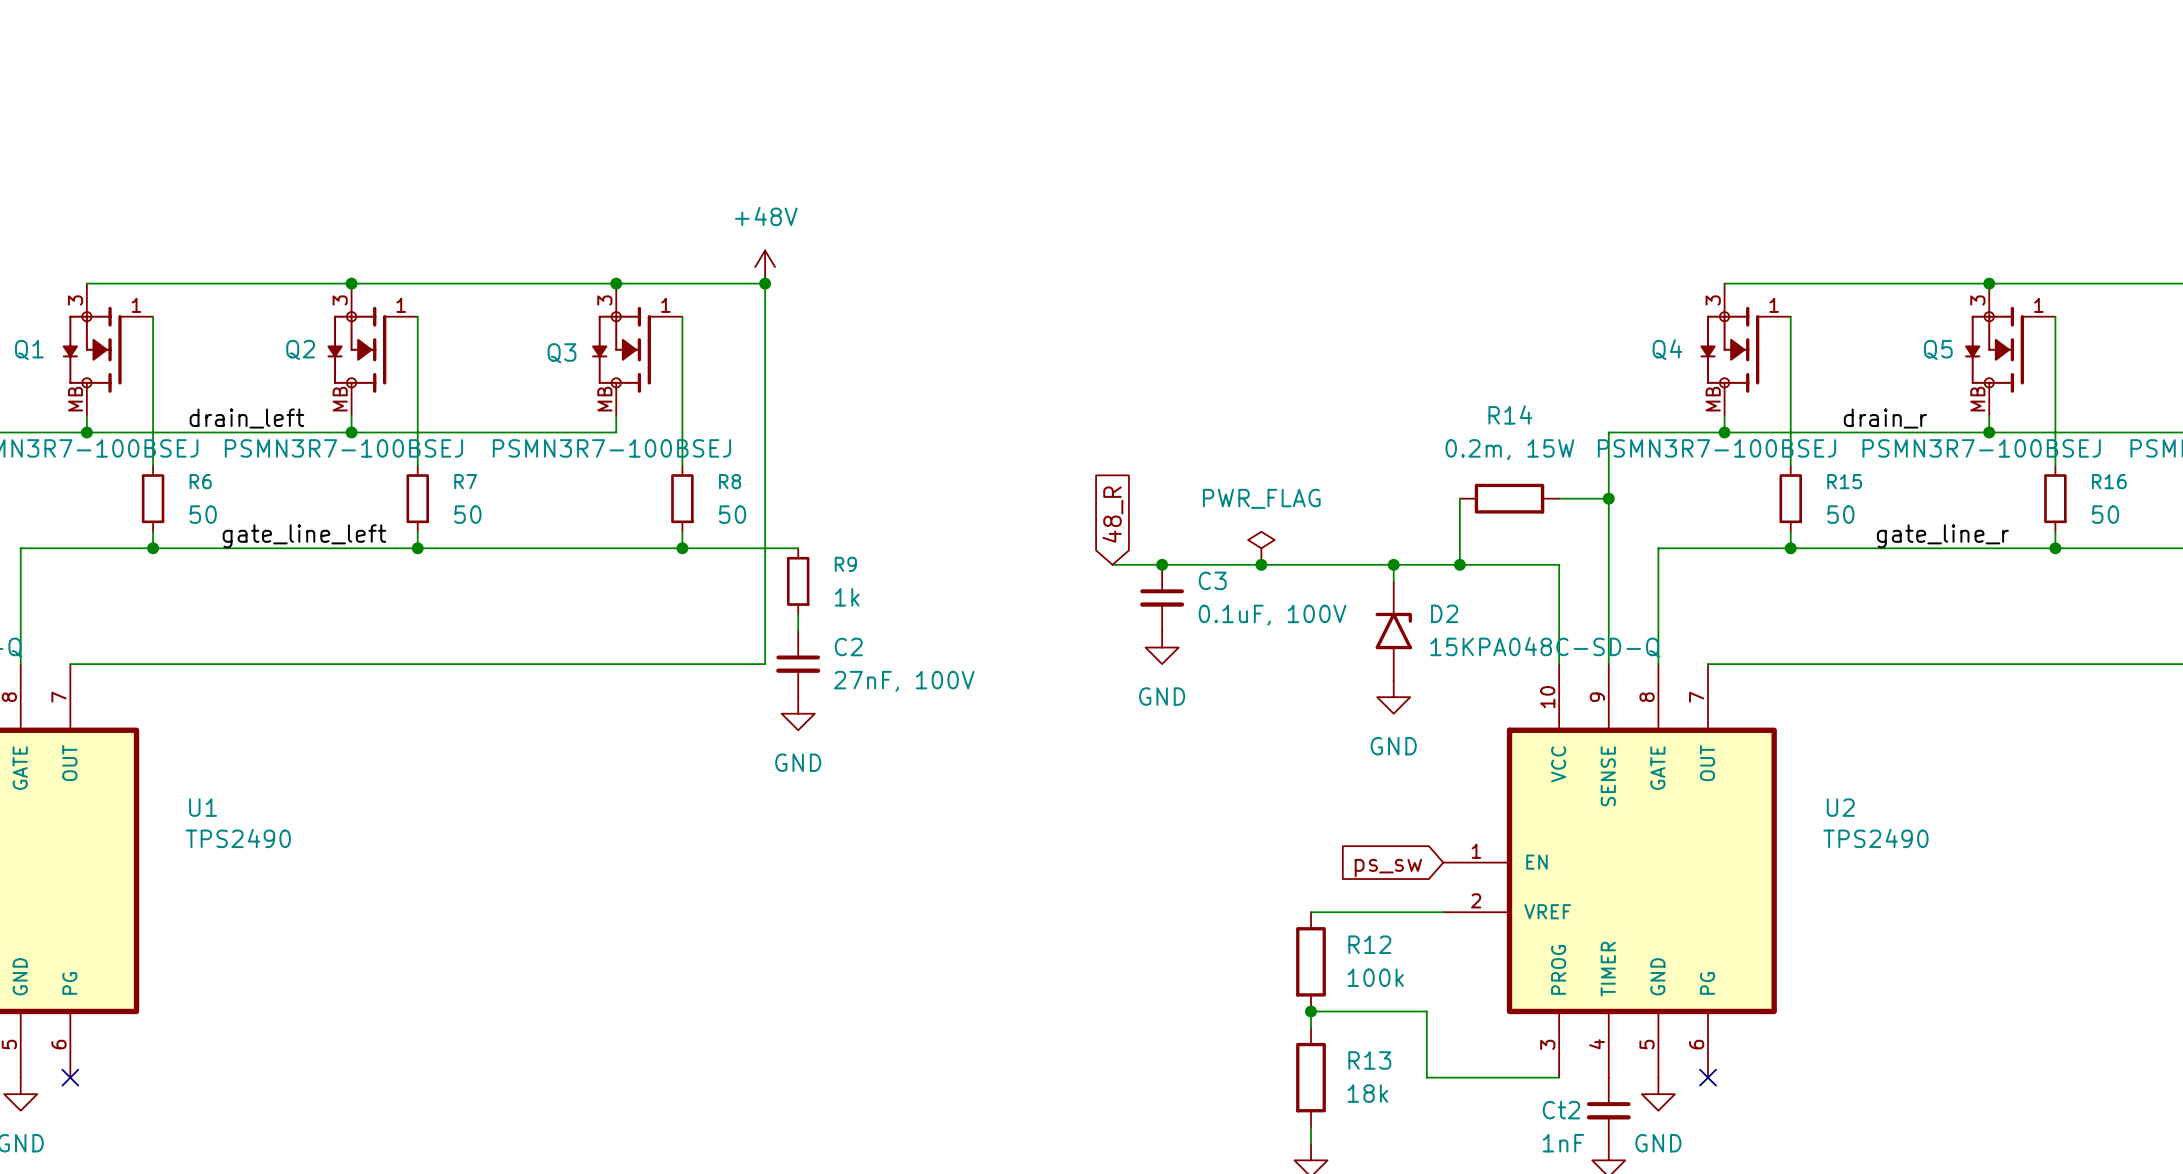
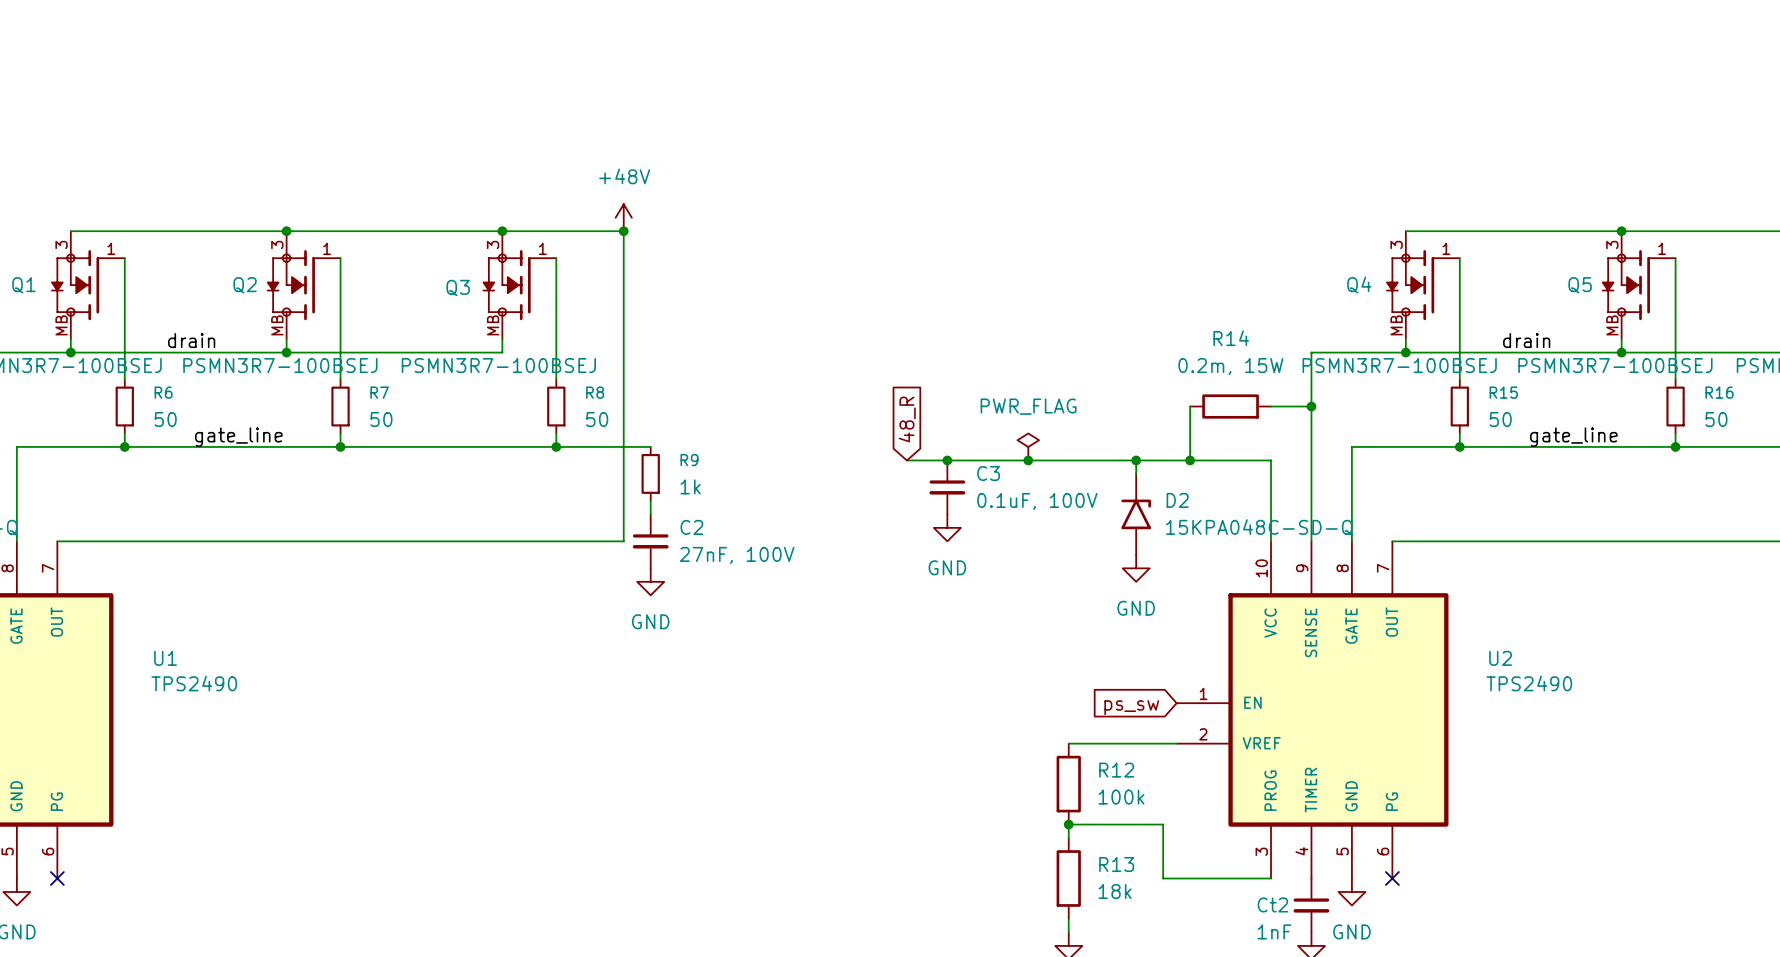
label: drain_left (246, 418) -> drain (191, 340)
label: drain_r (1885, 418) -> drain (1526, 340)
label: gate_line_left (304, 536) -> gate_line (238, 437)
label: gate_line_r (1942, 536) -> gate_line (1573, 437)

